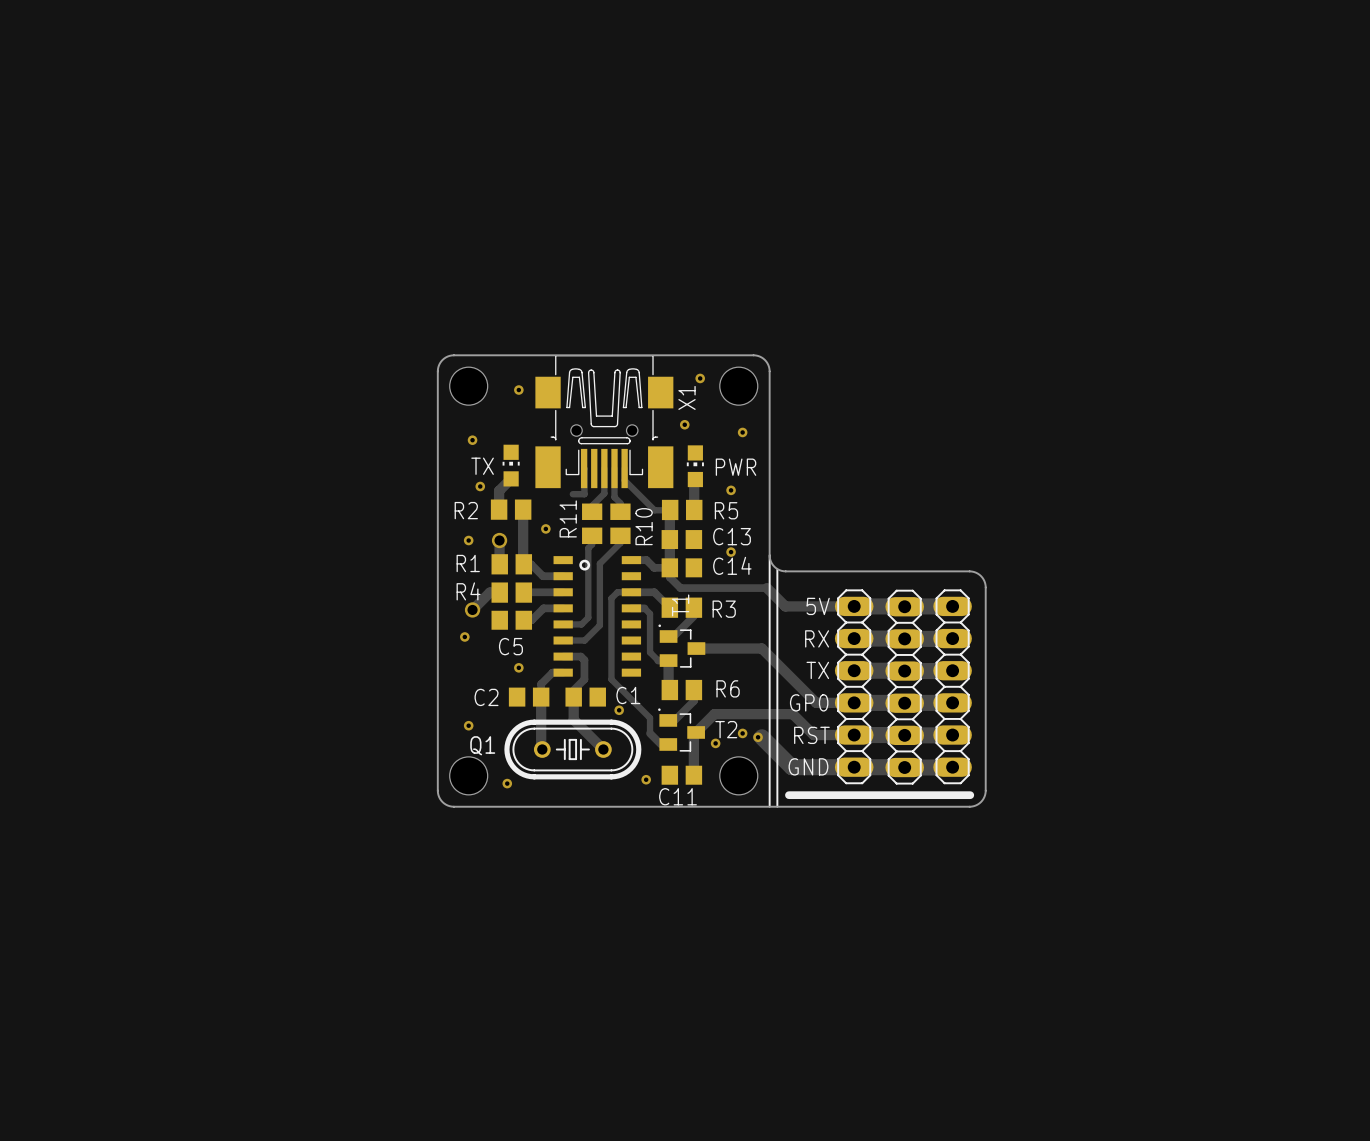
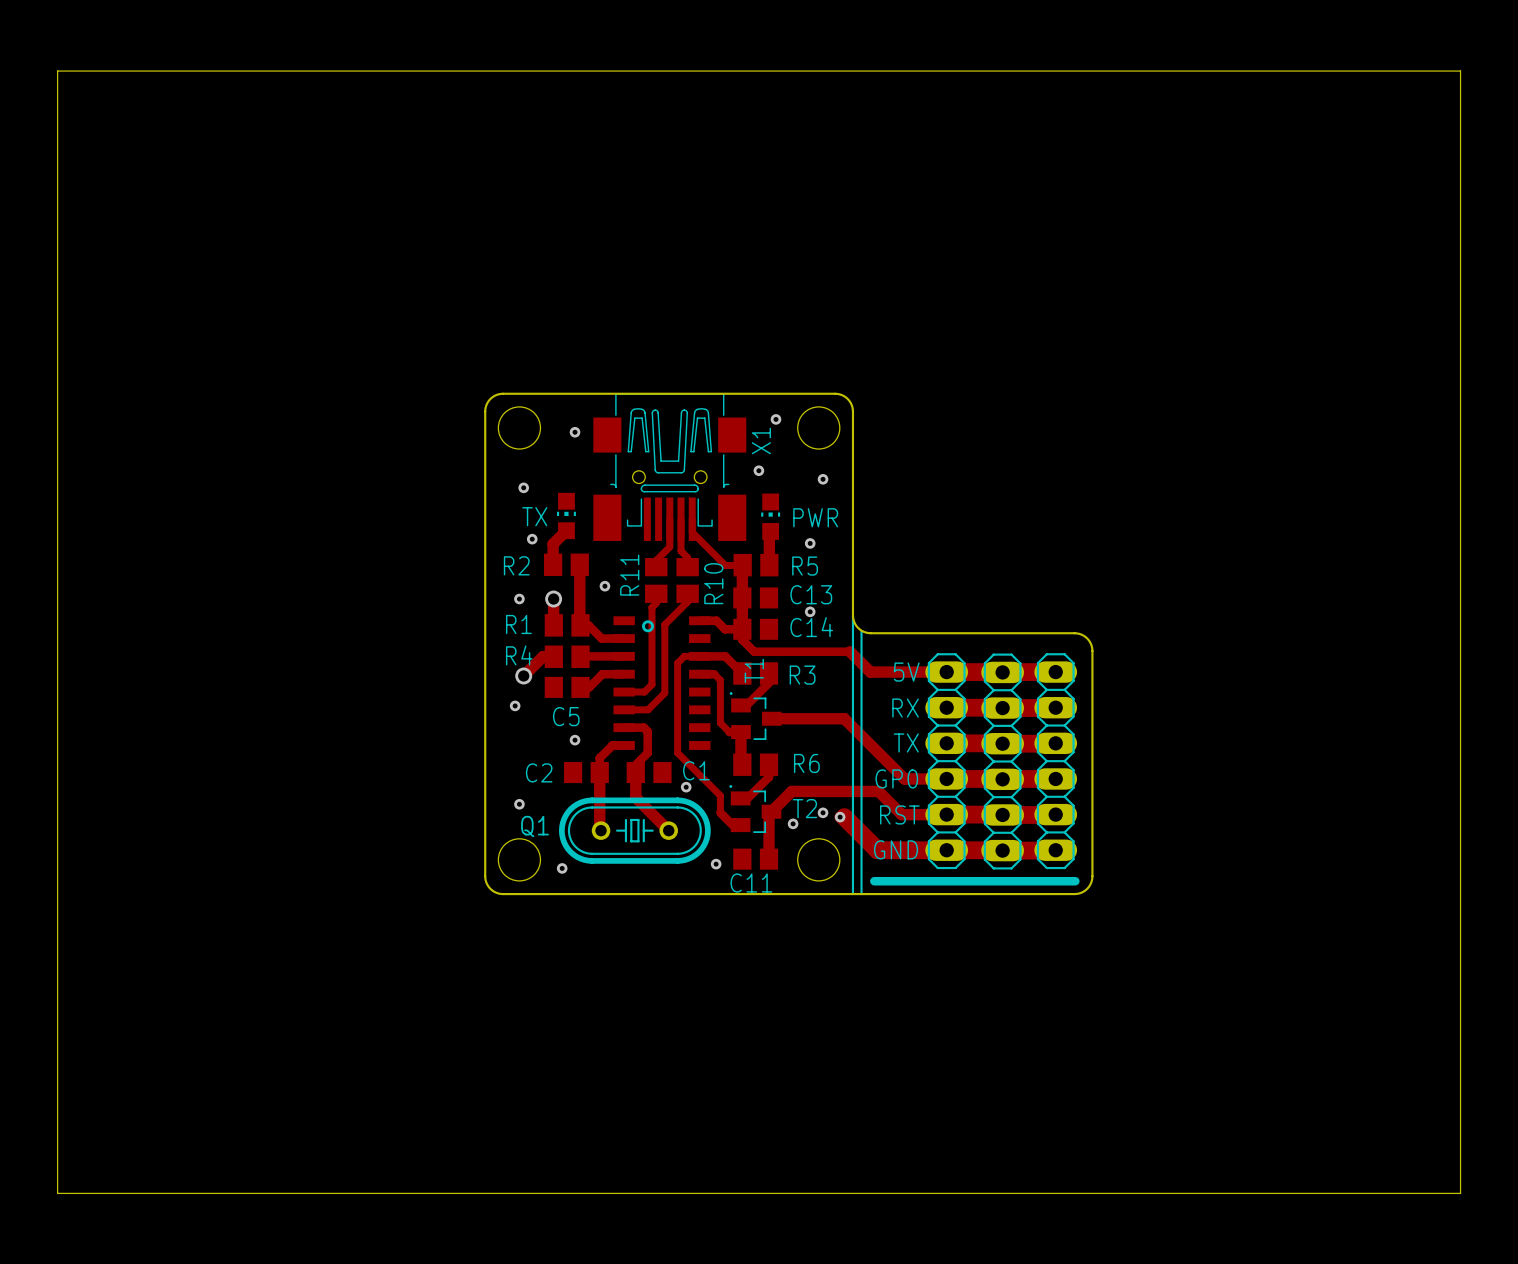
board edge: none -> (57, 71) (1460, 71) (1460, 1193) (57, 1193) (57, 71)
track: (584, 468) (584, 494) (572, 494) -> none

